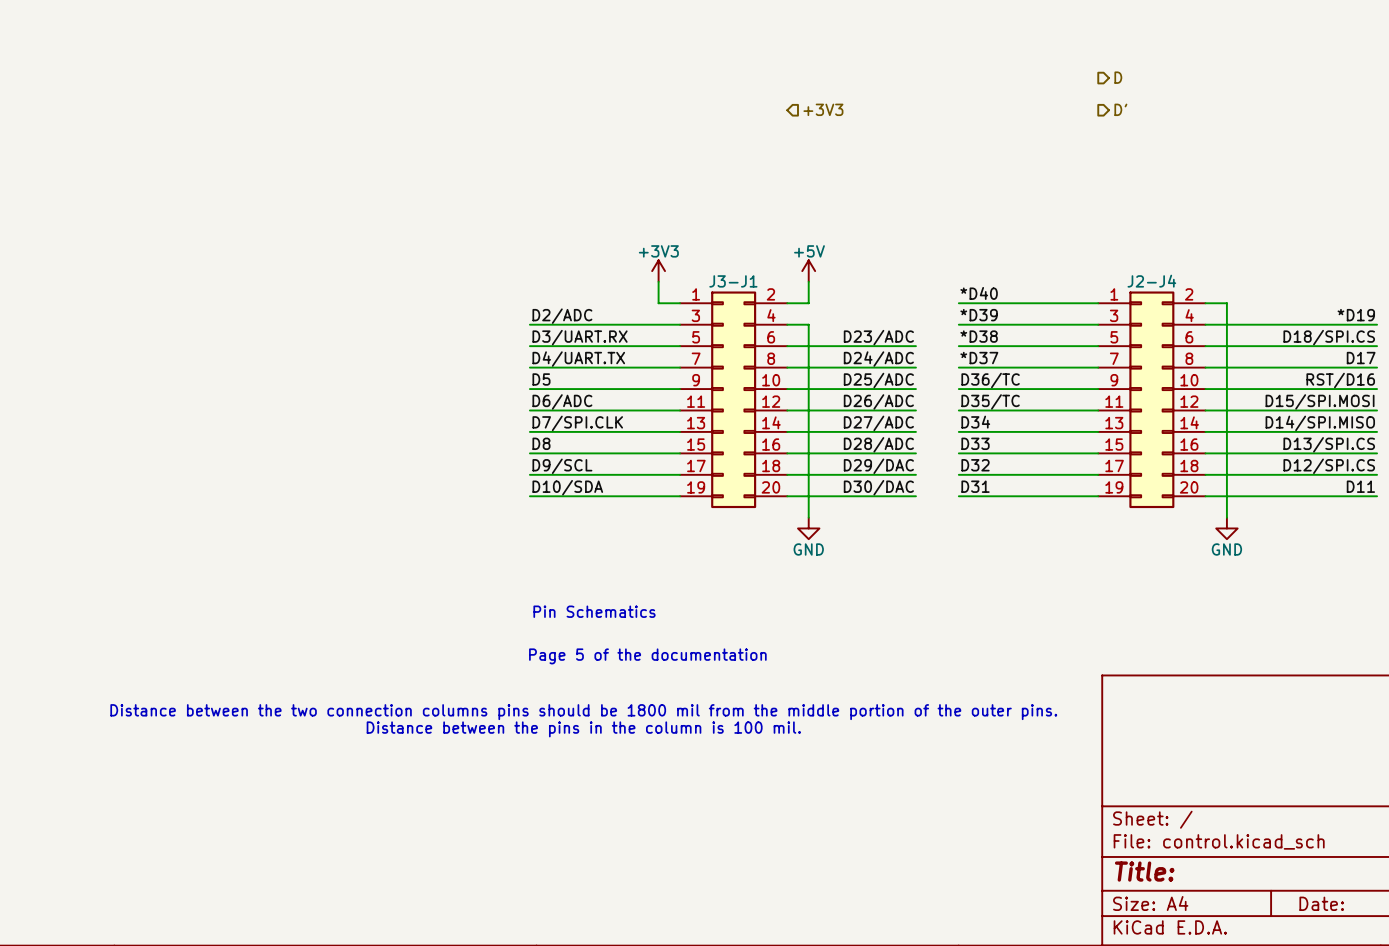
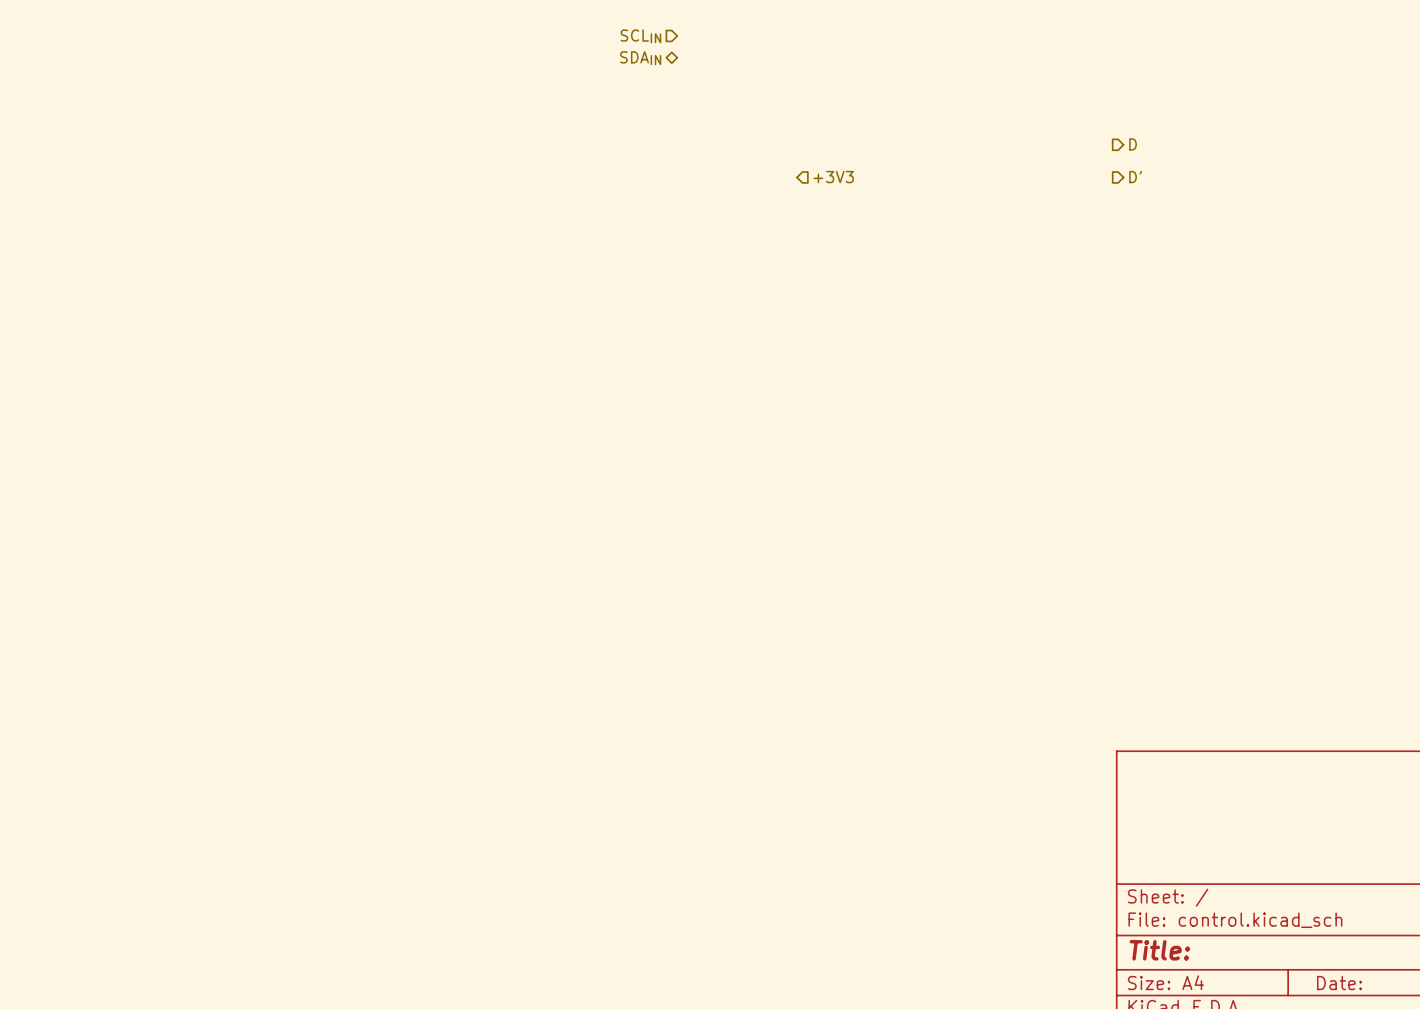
power symbol: +3V3 (658, 271) -> none
power symbol: +5V (808, 271) -> none
wire: (658, 281) (658, 303) (680, 303) -> none
wire: (808, 281) (808, 303) (787, 303) -> none
label: *D40 (979, 293) -> none
wire: (958, 303) (1098, 303) -> none
wire: (1205, 303) (1226, 303) (1226, 517) -> none
label: *D39 (979, 315) -> none
label: *D19 (1356, 315) -> none
label: D2/ADC (562, 316) -> none
wire: (529, 324) (680, 324) -> none
wire: (787, 324) (808, 324) (808, 517) -> none
wire: (958, 324) (1098, 324) -> none
wire: (1205, 324) (1377, 324) -> none
label: *D38 (979, 336) -> none
label: D3/UART.RX (580, 337) -> none
label: D23/ADC (878, 337) -> none
label: D18/SPI.CS (1329, 337) -> none
wire: (529, 346) (680, 346) -> none
wire: (787, 346) (915, 346) -> none
wire: (958, 346) (1098, 346) -> none
wire: (1205, 346) (1377, 346) -> none
label: *D37 (979, 358) -> none
label: D17 (1361, 358) -> none
label: D4/UART.TX (578, 359) -> none
label: D24/ADC (878, 359) -> none
wire: (529, 367) (680, 367) -> none
wire: (787, 367) (915, 367) -> none
wire: (958, 367) (1098, 367) -> none
wire: (1205, 367) (1377, 367) -> none
label: D5 (541, 379) -> none
label: D25/ADC (878, 380) -> none
label: D36/TC (990, 380) -> none
label: RST/D16 (1340, 380) -> none
wire: (529, 389) (680, 389) -> none
wire: (787, 389) (915, 389) -> none
wire: (958, 389) (1098, 389) -> none
wire: (1205, 389) (1377, 389) -> none
J3-J1: (733, 399) -> none
J2-J4: (1151, 399) -> none
label: D6/ADC (562, 401) -> none
label: D26/ADC (878, 401) -> none
label: D35/TC (990, 401) -> none
label: D15/SPI.MOSI (1320, 401) -> none
wire: (529, 410) (680, 410) -> none
wire: (787, 410) (915, 410) -> none
wire: (958, 410) (1098, 410) -> none
wire: (1205, 410) (1377, 410) -> none
label: D34 (975, 422) -> none
label: D7/SPI.CLK (577, 423) -> none
label: D27/ADC (878, 423) -> none
label: D14/SPI.MISO (1320, 423) -> none
wire: (529, 431) (680, 431) -> none
wire: (787, 431) (915, 431) -> none
wire: (958, 431) (1098, 431) -> none
wire: (1205, 431) (1377, 431) -> none
label: D8 (541, 443) -> none
label: D33 (975, 443) -> none
label: D28/ADC (878, 444) -> none
label: D13/SPI.CS (1329, 444) -> none
wire: (529, 453) (680, 453) -> none
wire: (787, 453) (915, 453) -> none
wire: (958, 453) (1098, 453) -> none
wire: (1205, 453) (1377, 453) -> none
label: D32 (975, 465) -> none
label: D9/SCL (562, 466) -> none
label: D29/DAC (878, 466) -> none
label: D12/SPI.CS (1329, 466) -> none
wire: (529, 474) (680, 474) -> none
wire: (787, 474) (915, 474) -> none
wire: (958, 474) (1098, 474) -> none
wire: (1205, 474) (1377, 474) -> none
label: D31 (975, 486) -> none
label: D11 (1360, 486) -> none
label: D10/SDA (567, 487) -> none
label: D30/DAC (878, 487) -> none
wire: (529, 496) (680, 496) -> none
wire: (787, 496) (915, 496) -> none
wire: (958, 496) (1098, 496) -> none
wire: (1205, 496) (1377, 496) -> none
power symbol: GND (808, 528) -> none
power symbol: GND (1226, 528) -> none
text: Pin Schematics (594, 611) -> none
text: Page 5 of the documentation (647, 656) -> none
text: Distance between the two connection columns pins should be 1800 mil from the middle portion of the outer pins. (583, 712) -> none
text: Distance between the pins in the column is 100 mil. (583, 729) -> none

